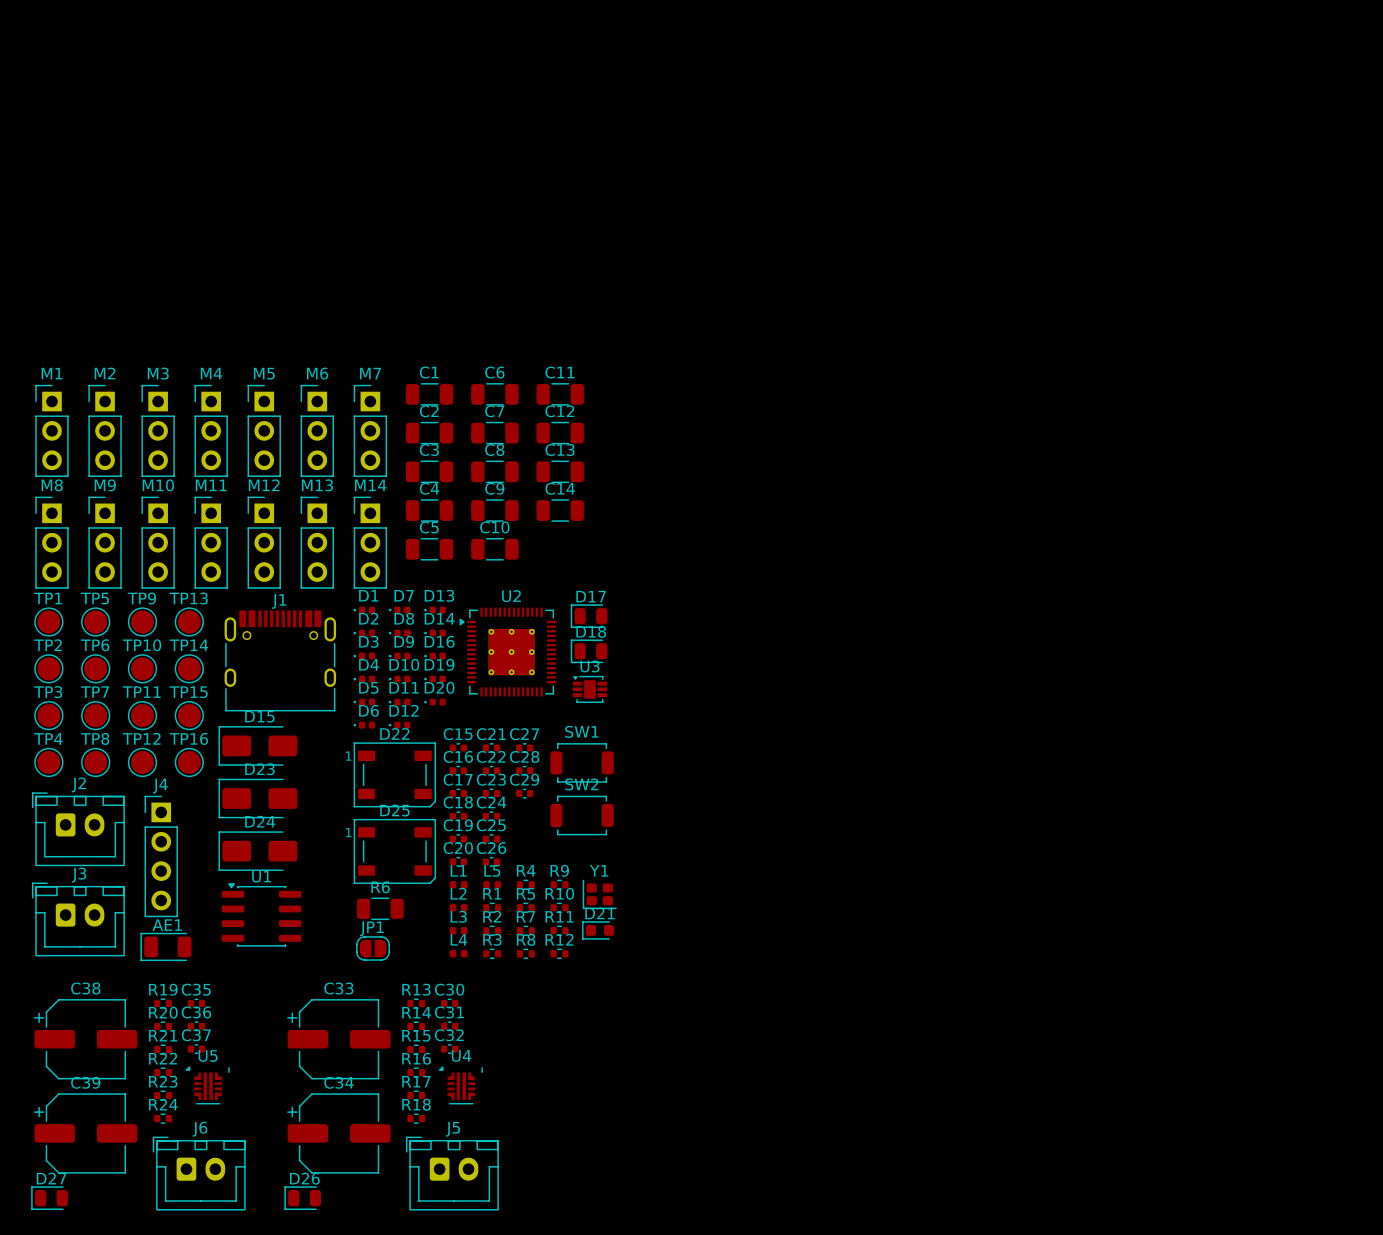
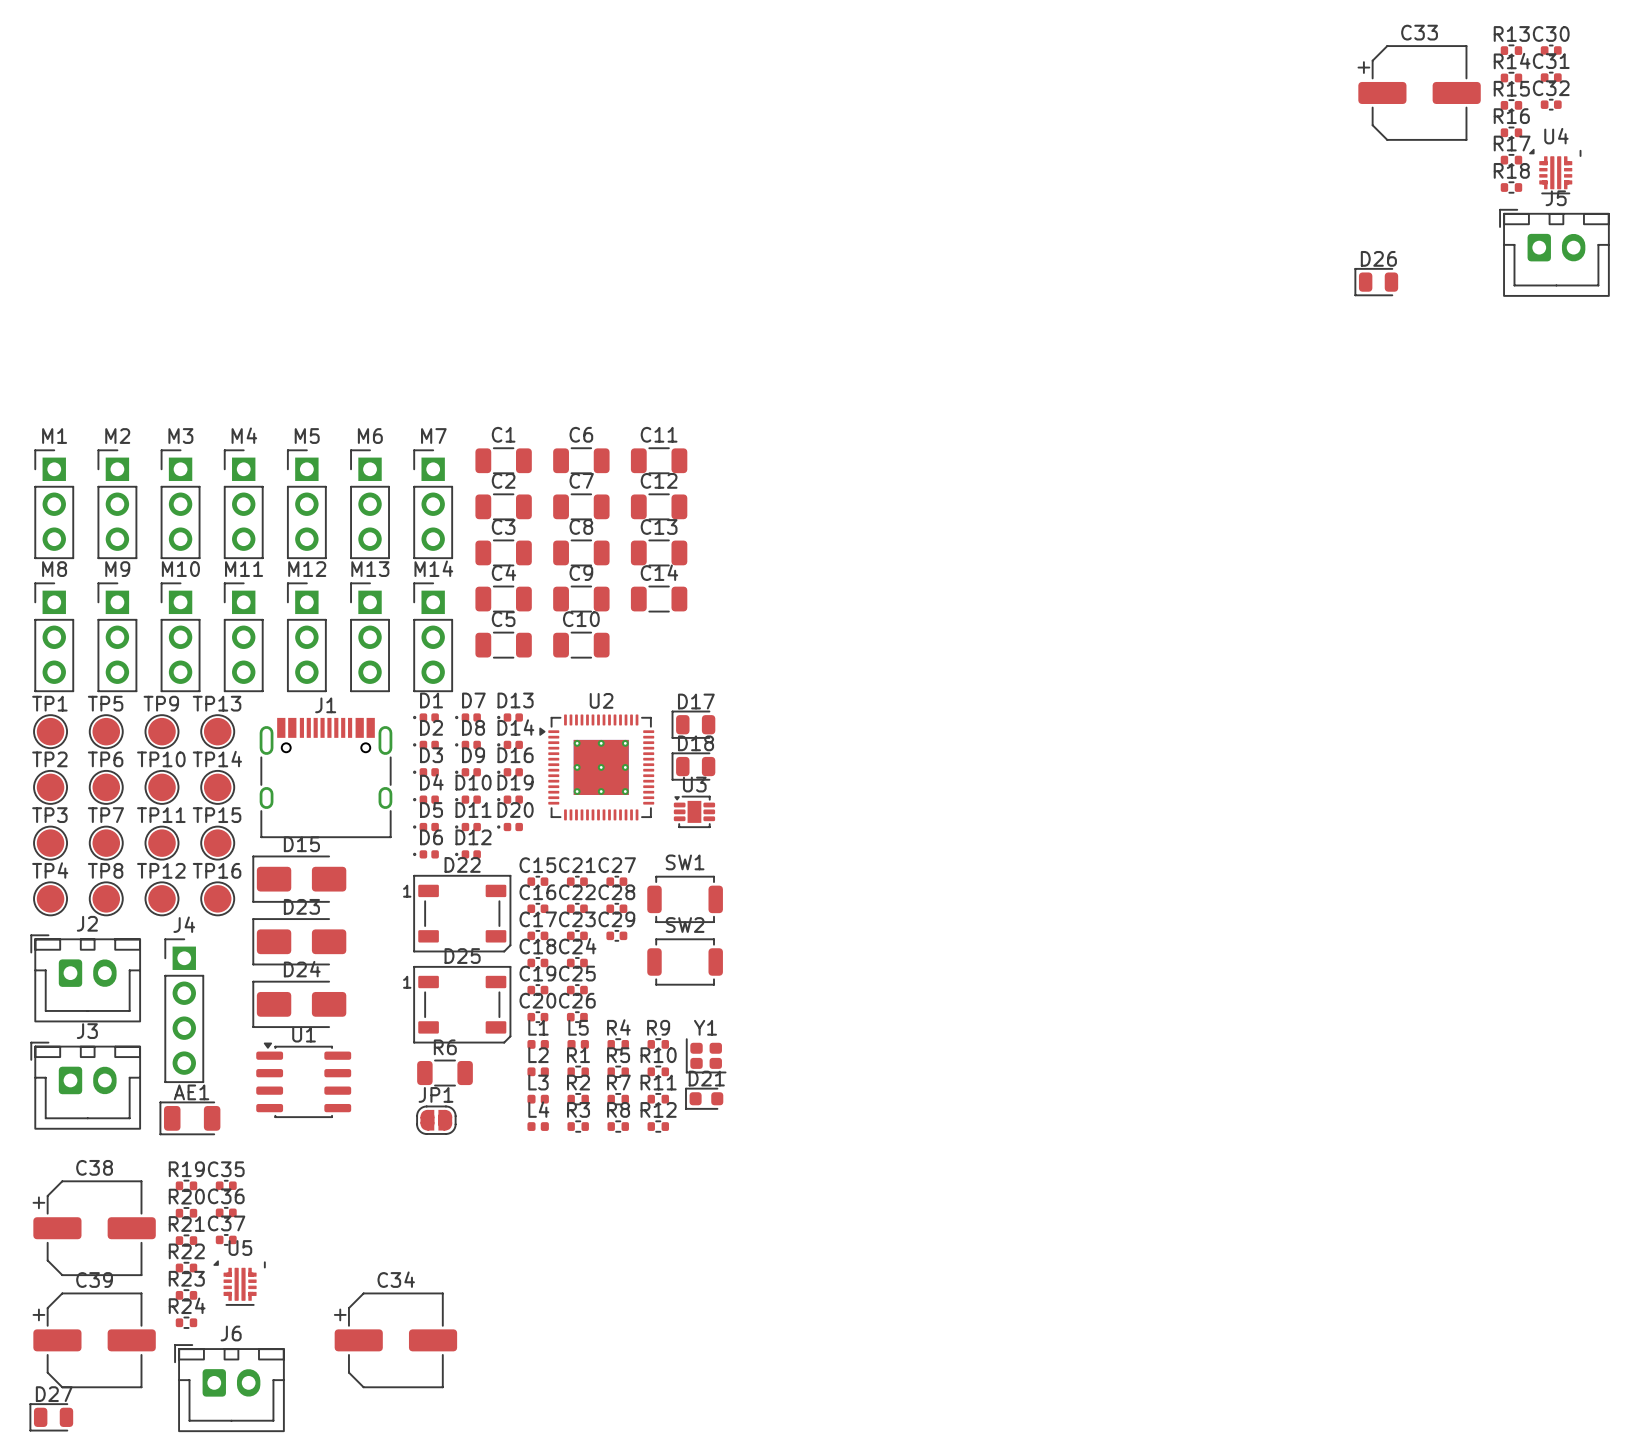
C33 footprint: [287, 999, 391, 1080] -> [1357, 45, 1481, 141]
R13 position: (416, 1003) -> (1511, 50)
C30 position: (449, 1003) -> (1551, 50)
R14 position: (416, 1026) -> (1511, 77)
C31 position: (449, 1026) -> (1551, 77)
R15 position: (416, 1049) -> (1511, 105)
C32 position: (449, 1049) -> (1551, 104)
R16 position: (416, 1072) -> (1511, 132)
U4 position: (460, 1085) -> (1555, 171)
R17 position: (416, 1095) -> (1511, 160)
R18 position: (416, 1118) -> (1511, 187)
J5 position: (452, 1173) -> (1554, 252)
D26 position: (302, 1198) -> (1376, 282)

